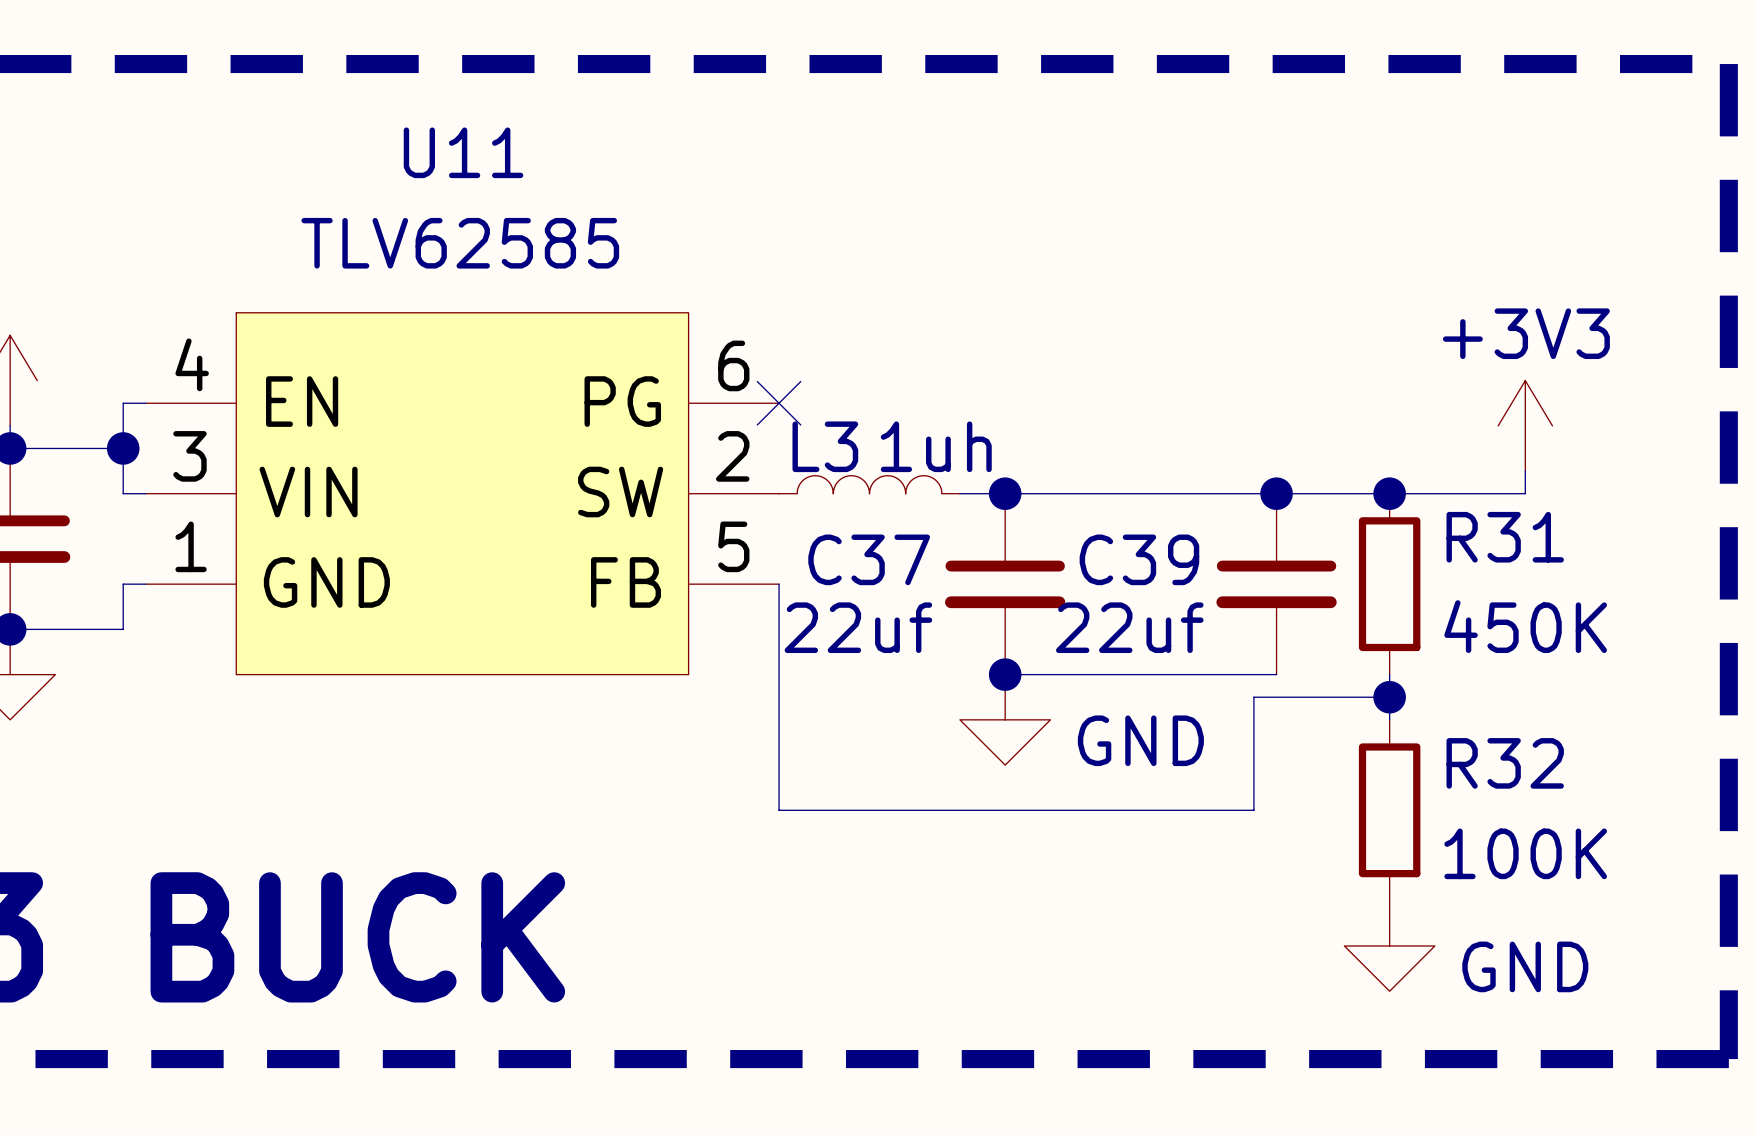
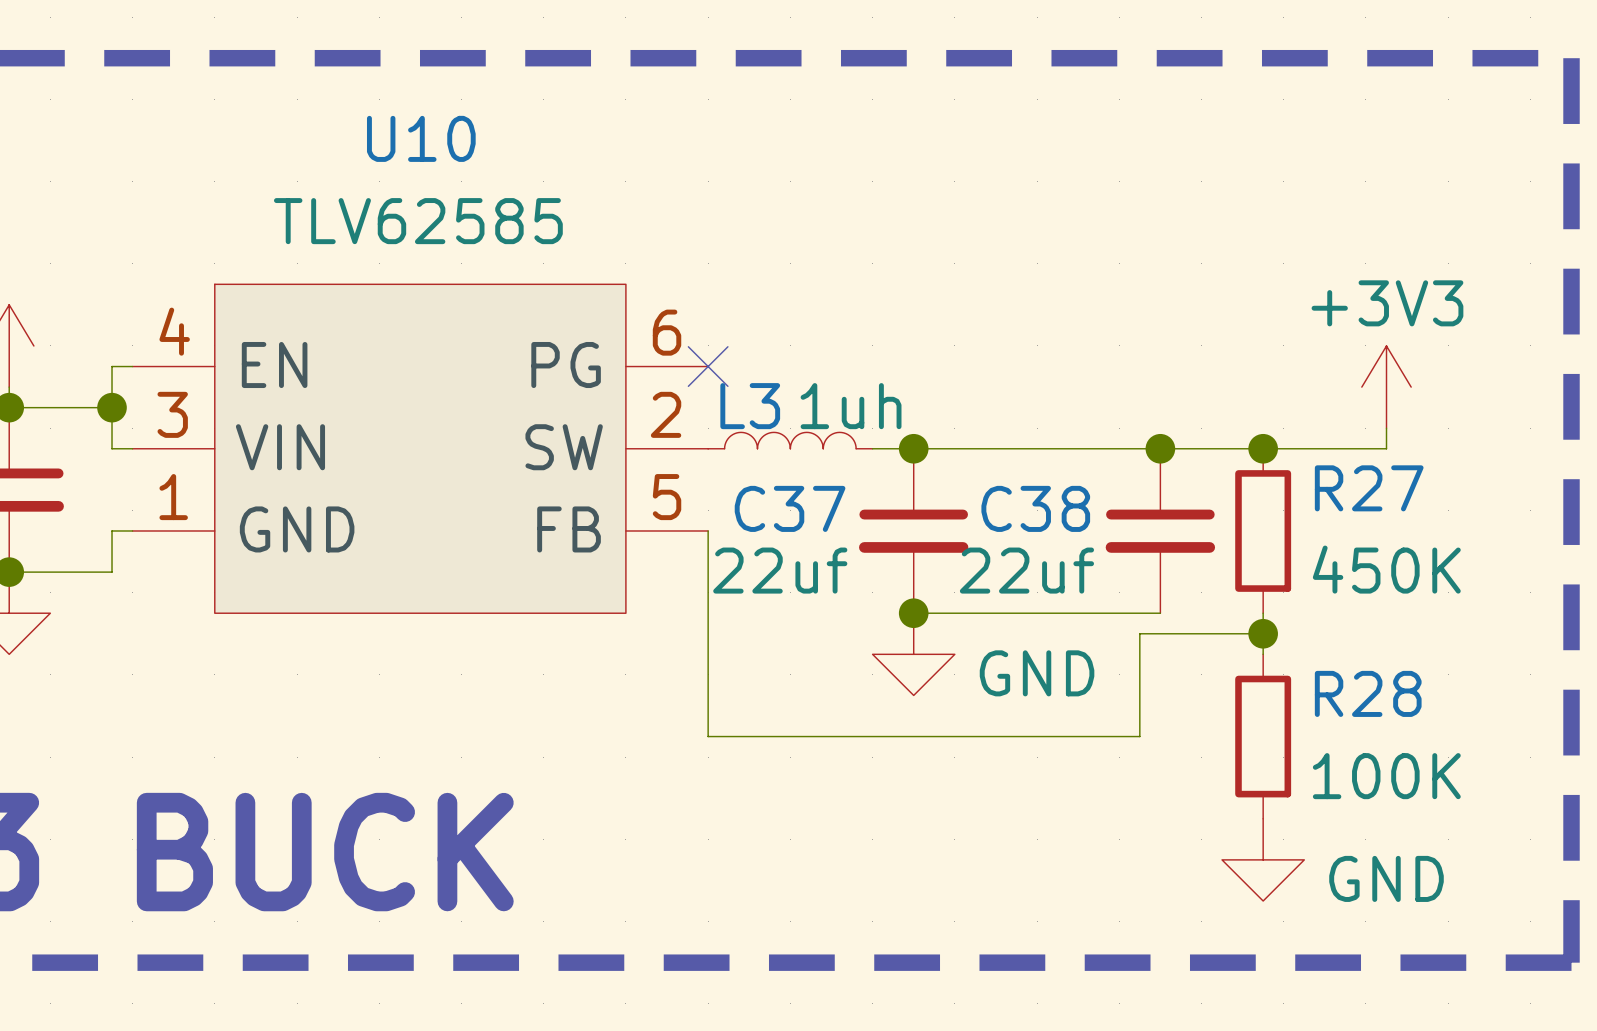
U11 name: U11 (463, 152) -> U10 (421, 138)
R31 name: R31 (1505, 537) -> R27 (1369, 488)
C39 name: C39 (1139, 559) -> C38 (1035, 508)
R32 name: R32 (1505, 763) -> R28 (1368, 693)

